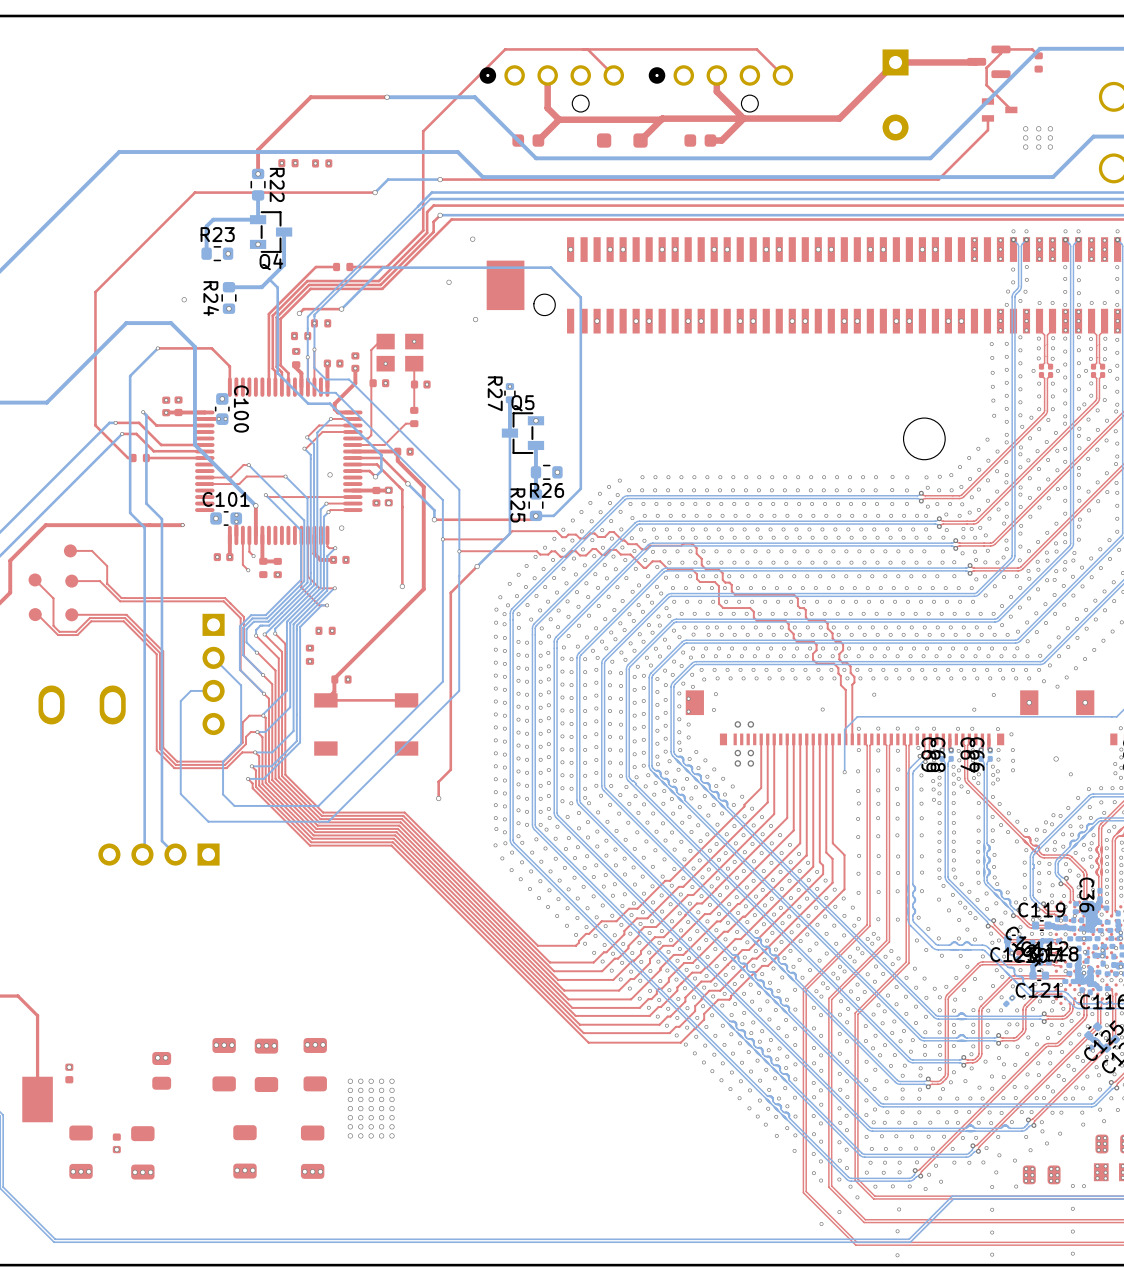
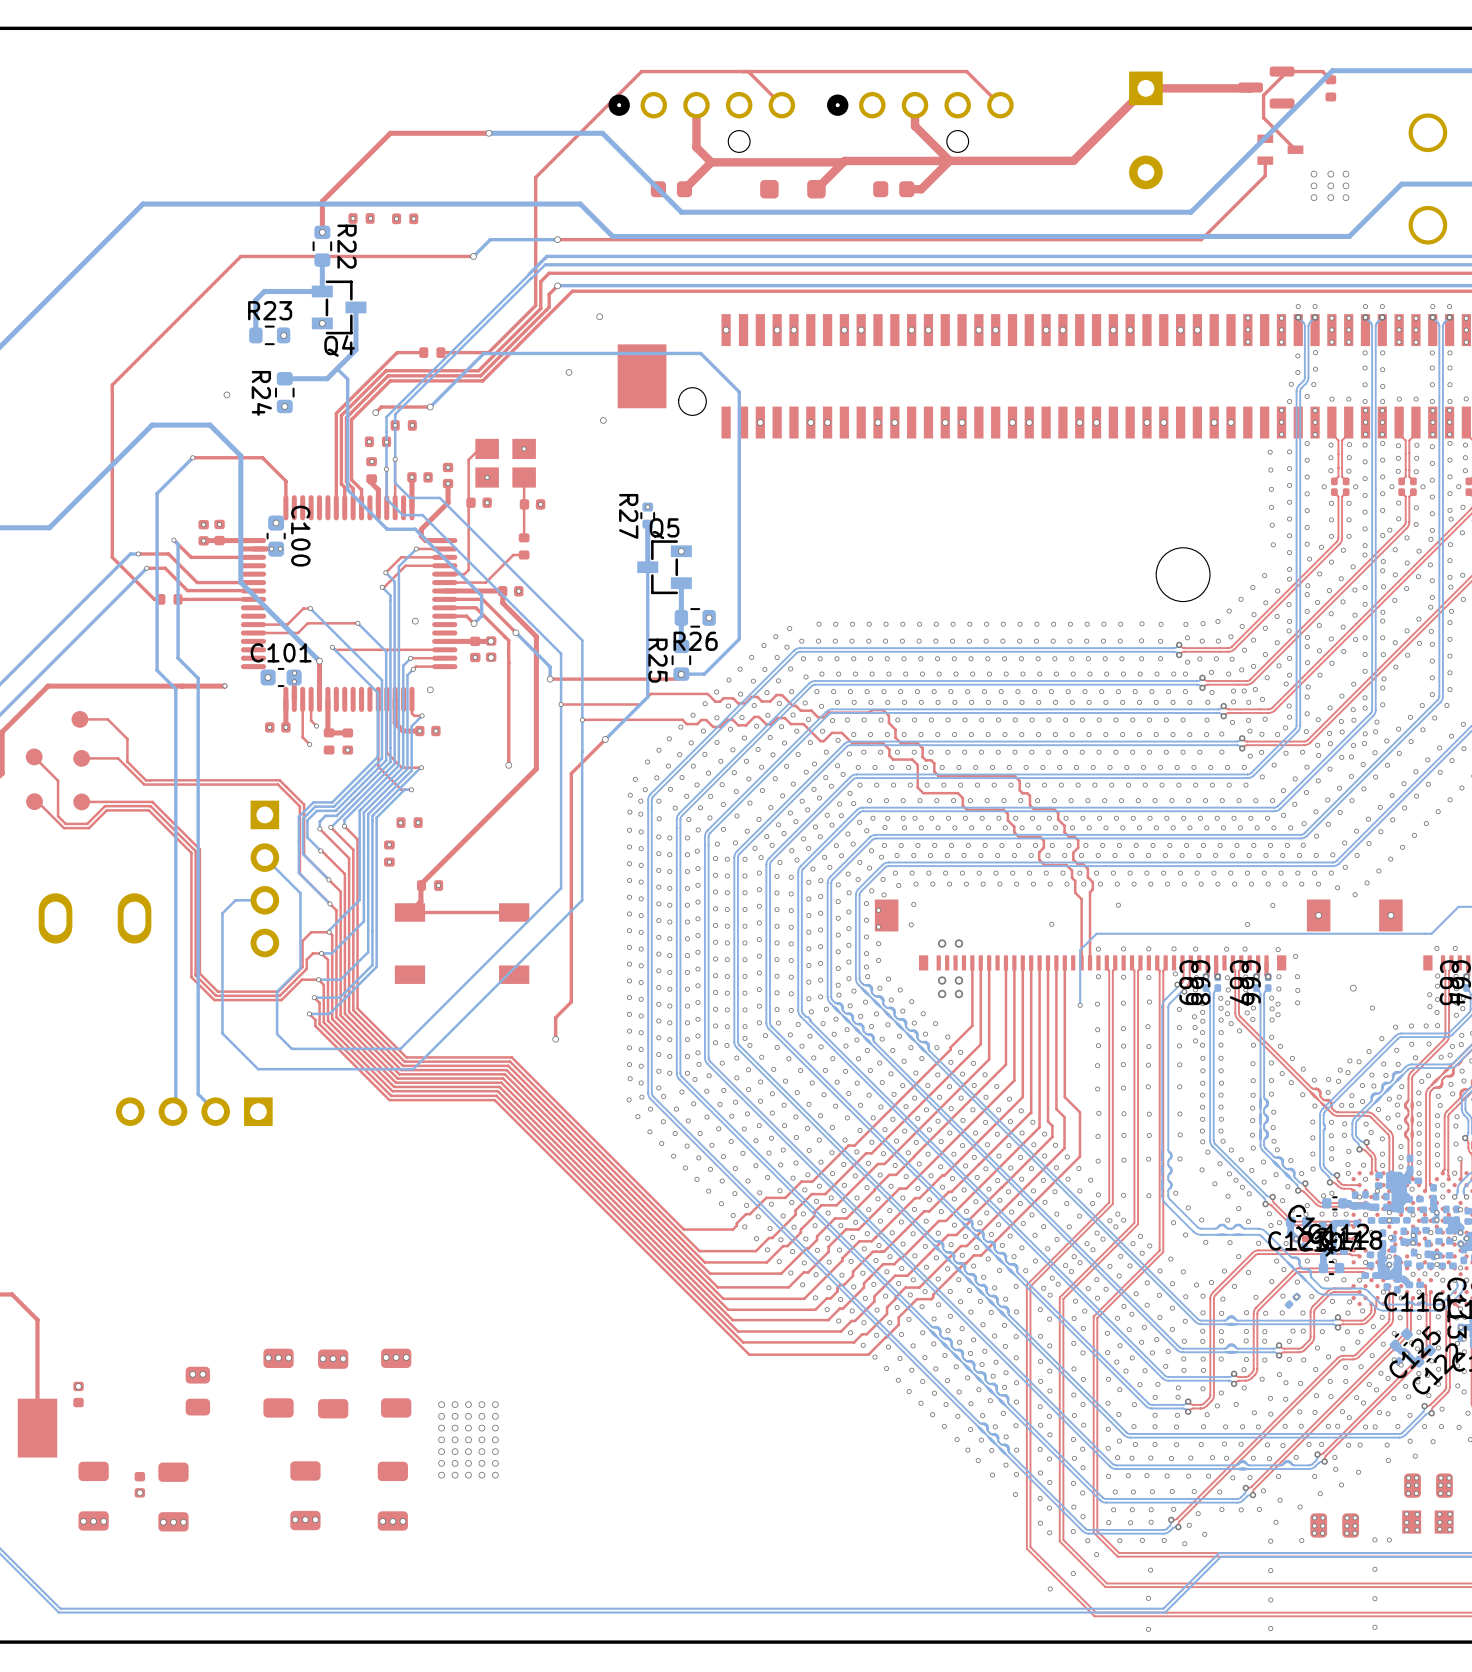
C36 name: C36 (1086, 894) -> none
C119 name: C119 (1041, 909) -> none
C121 name: C121 (1039, 990) -> none

